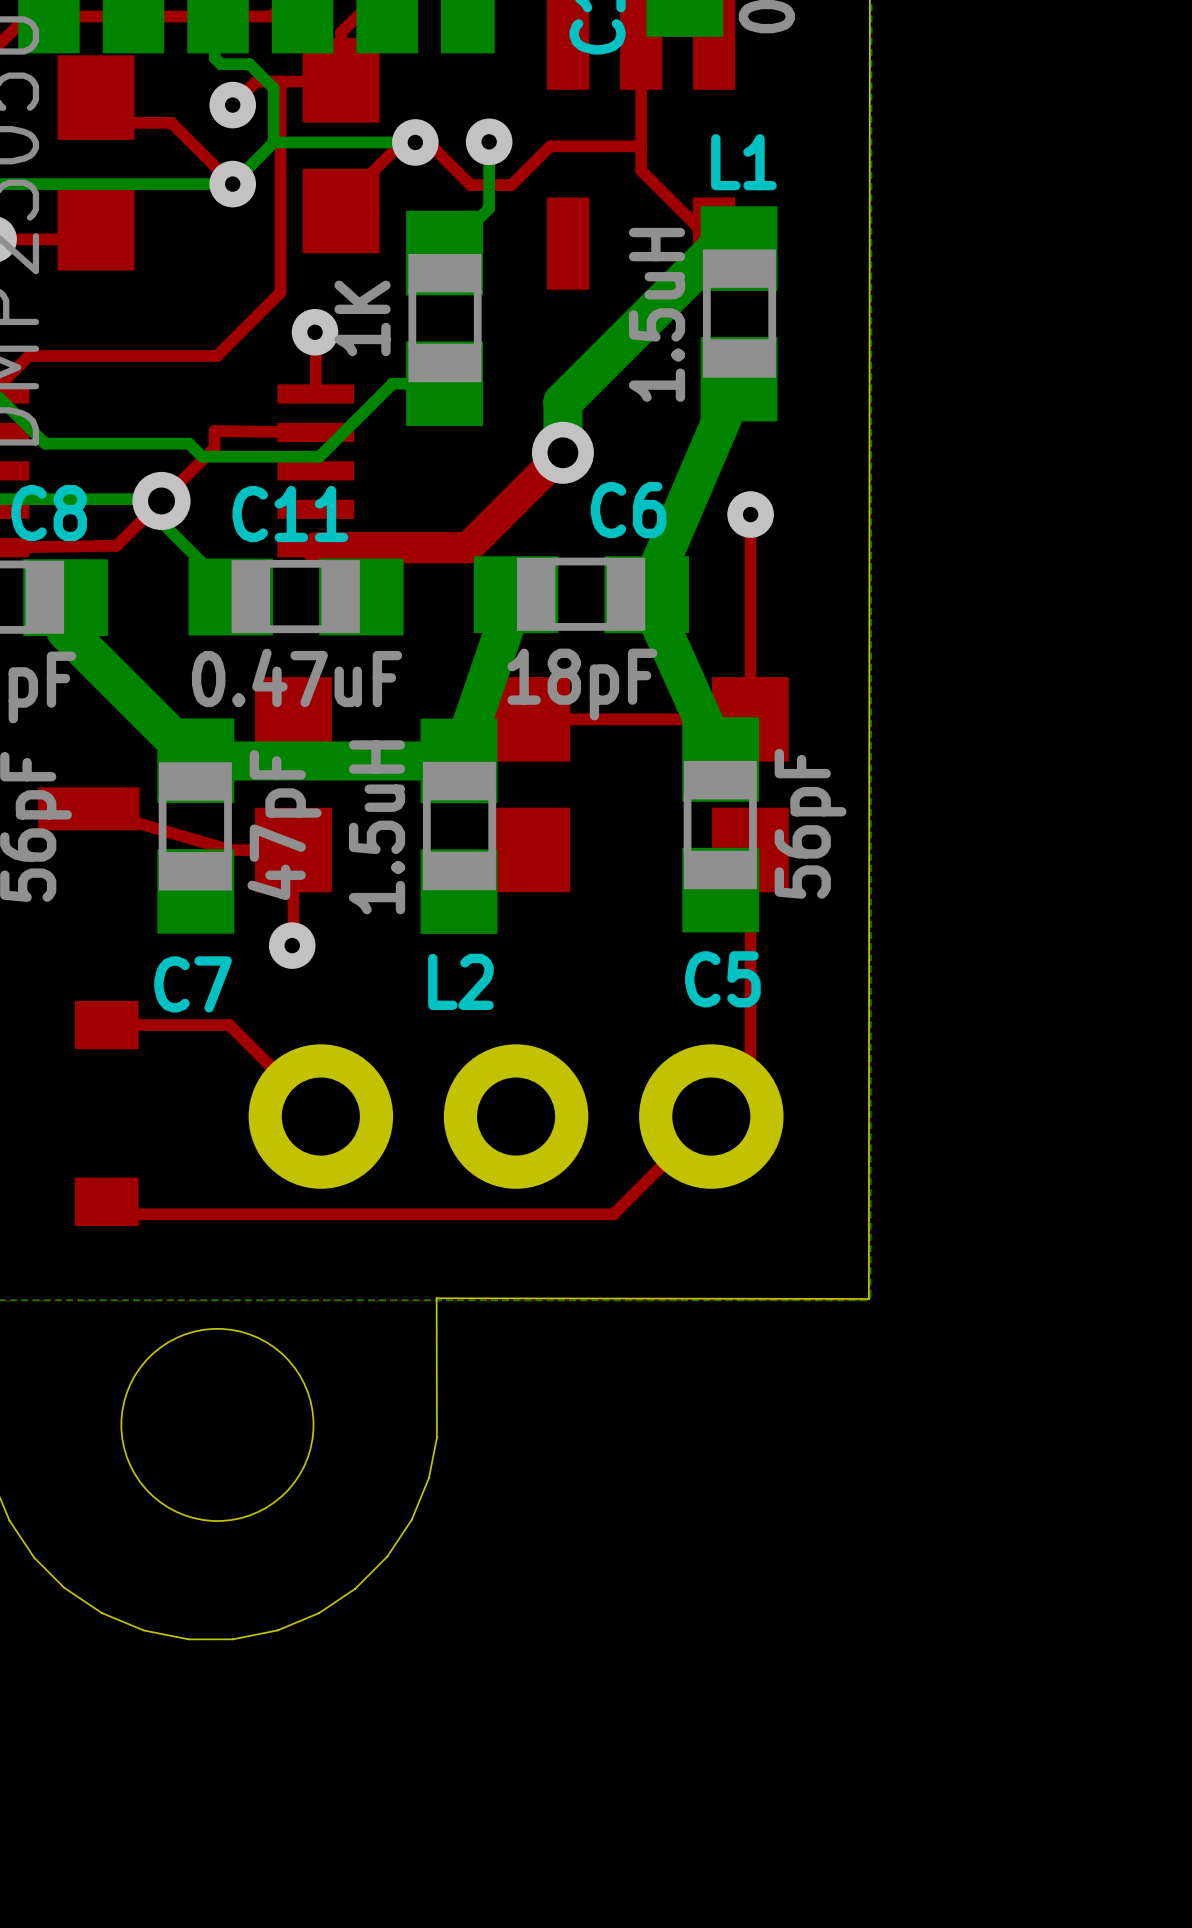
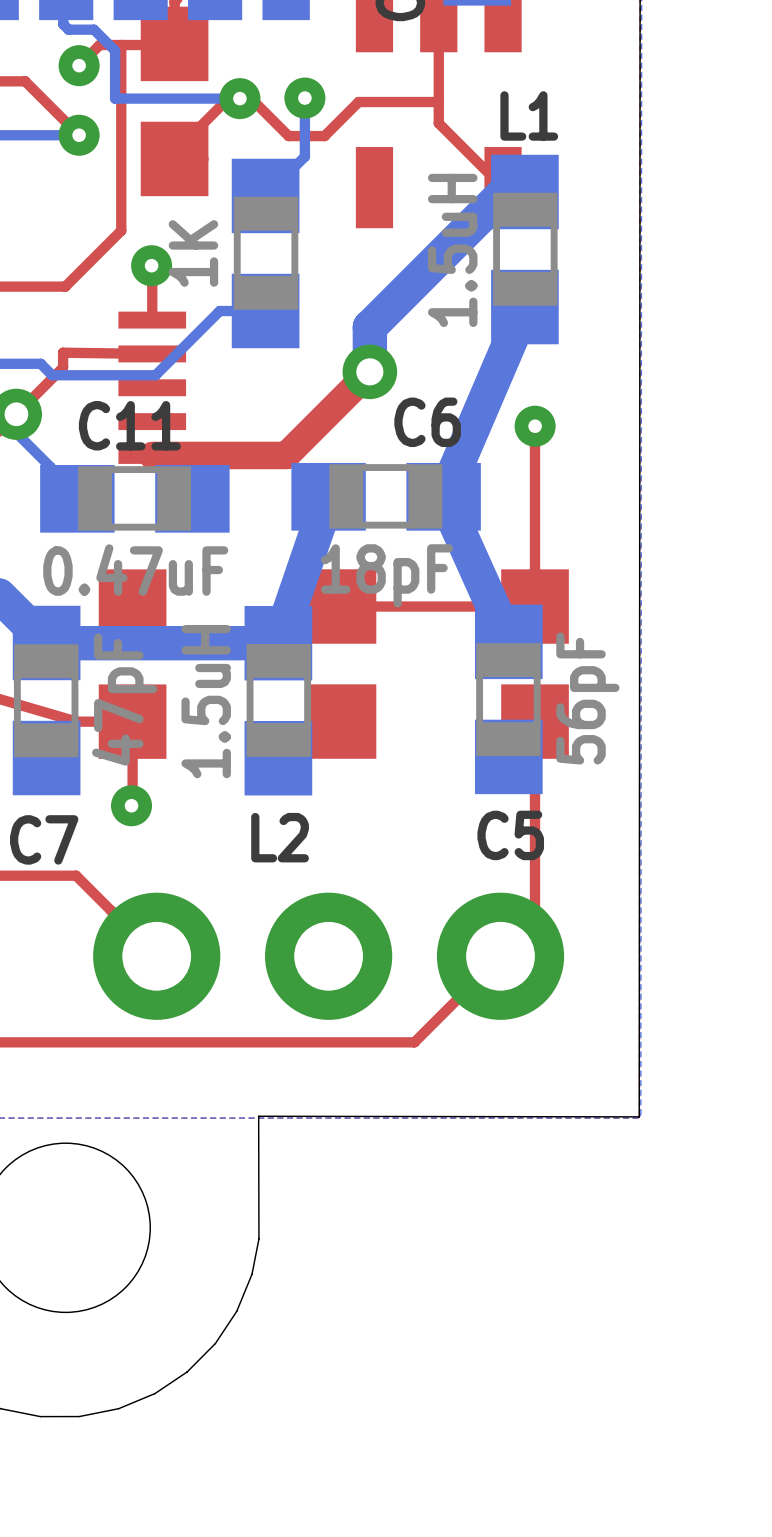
bottom track: (273, 142) (232, 184) -> none

